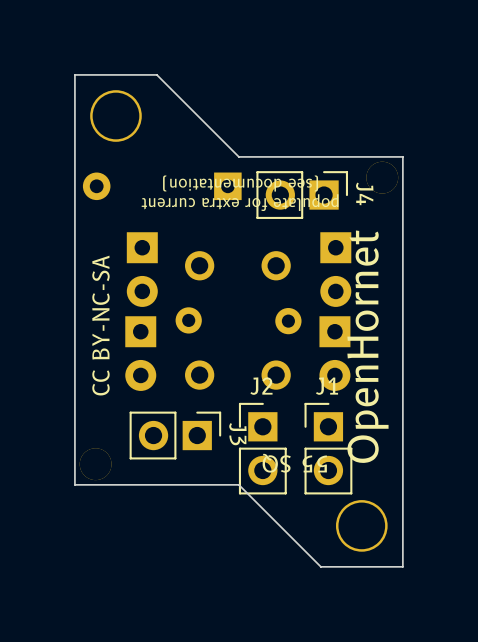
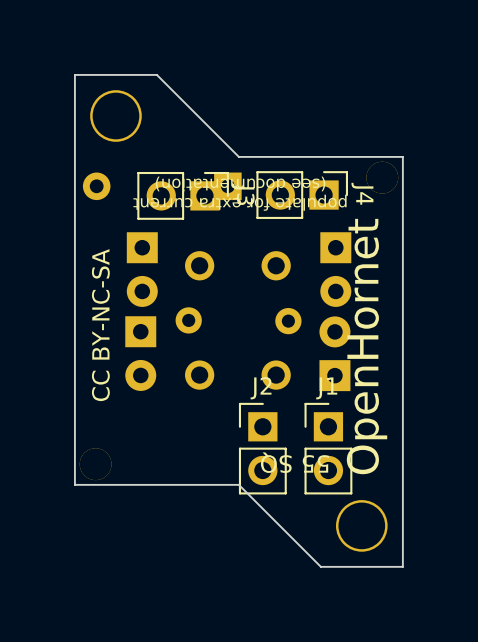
part rotation: 0° (334, 353) -> 180° (334, 353)
J3 position: (175, 435) -> (183, 195)

